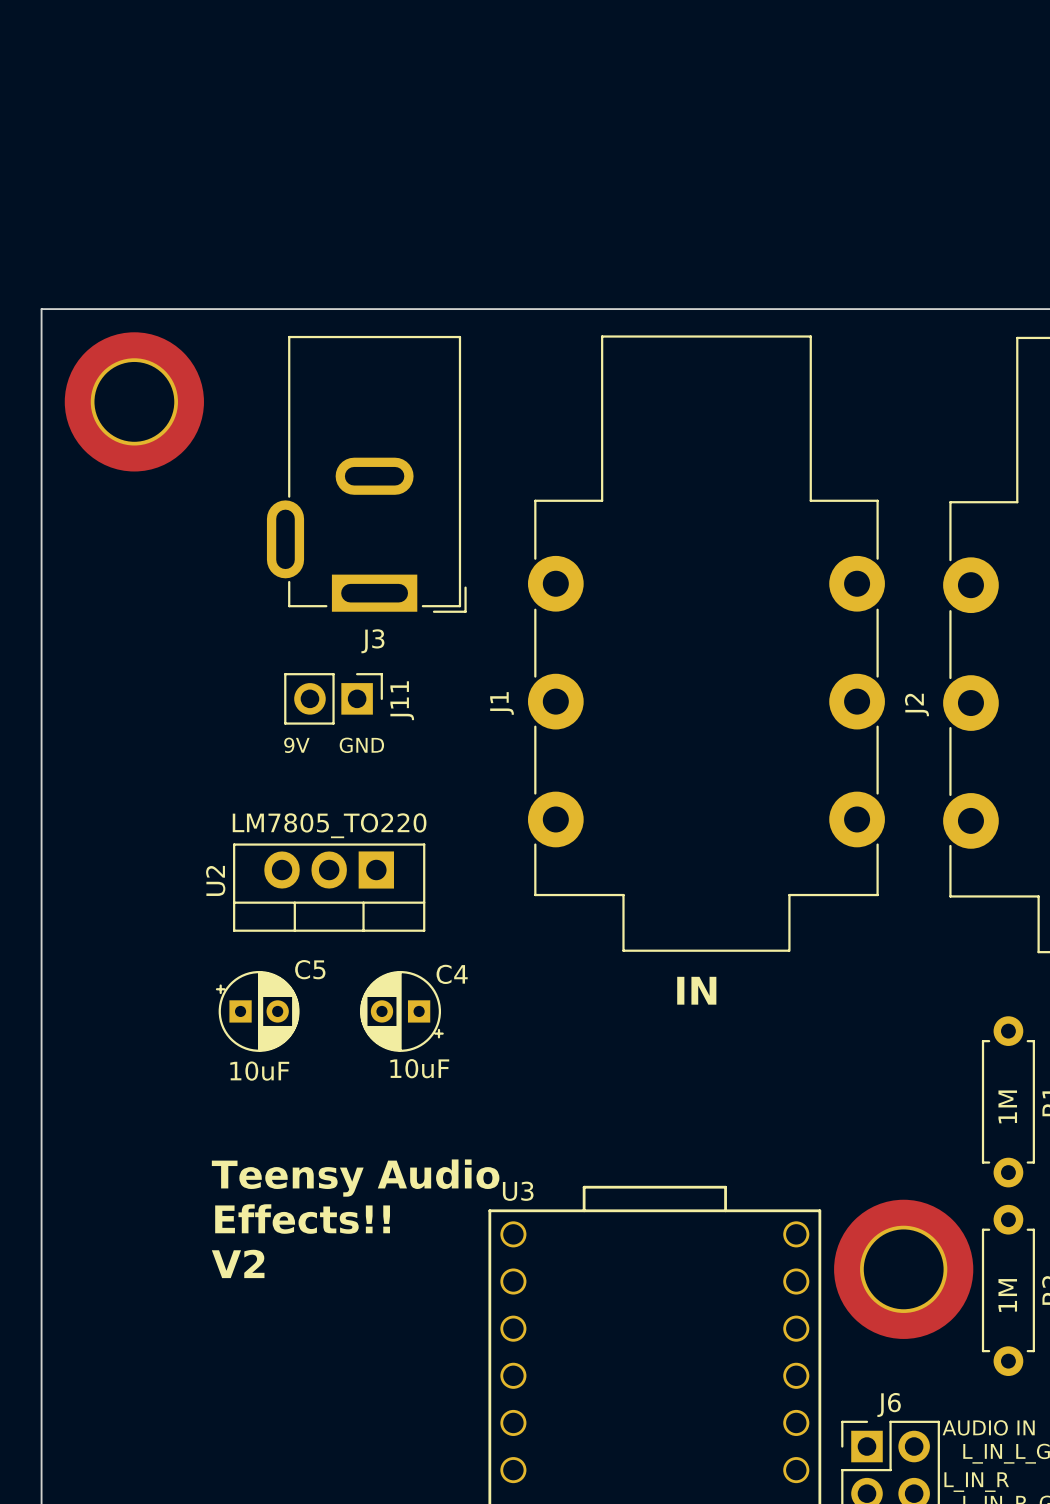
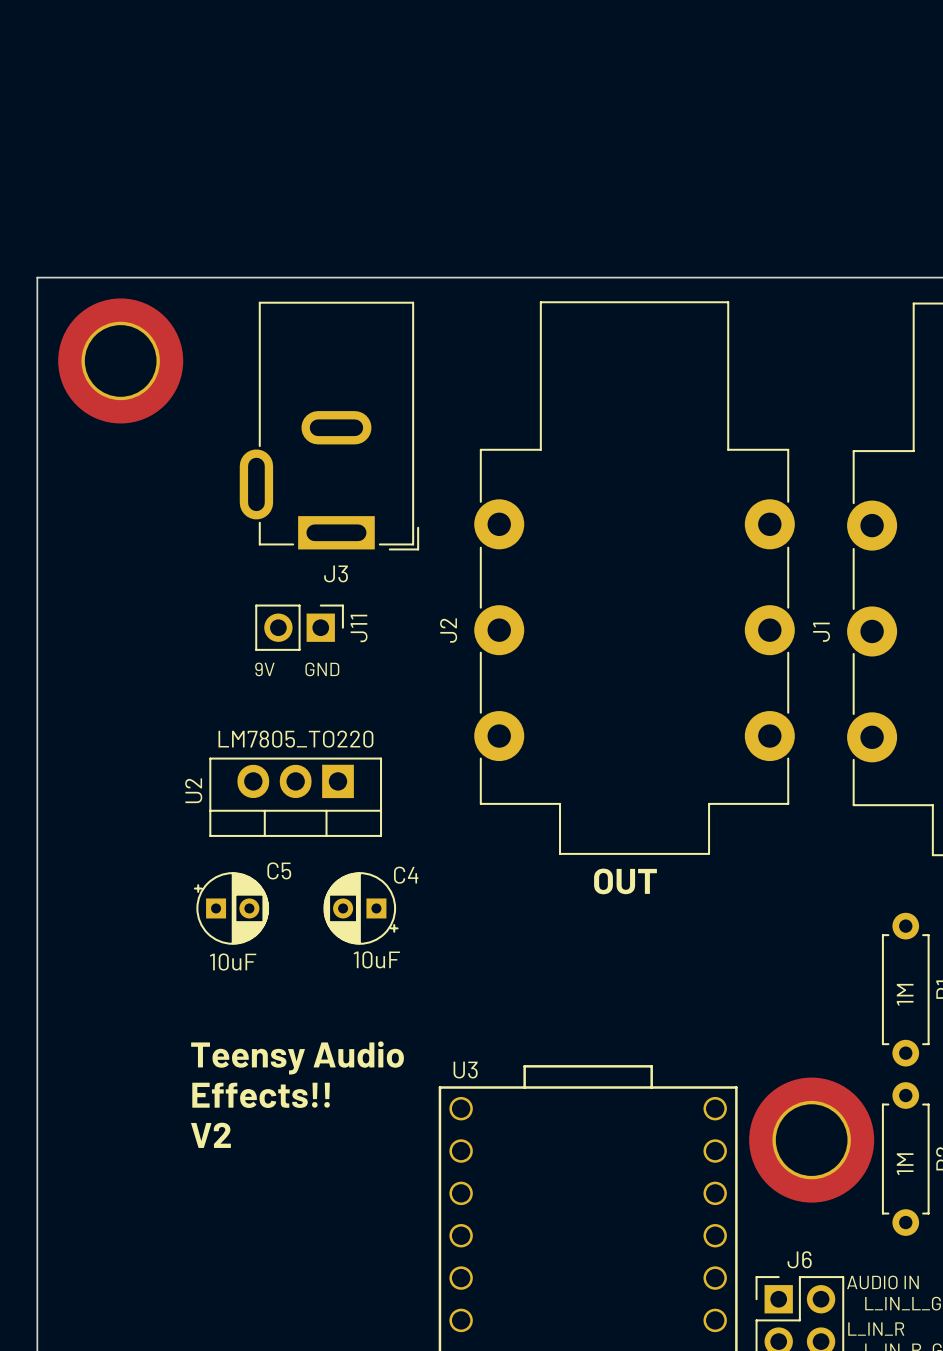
J1 name: J1 (502, 703) -> J2 (448, 630)
J2 name: J2 (916, 704) -> J1 (821, 632)
text: IN (696, 990) -> OUT (625, 881)

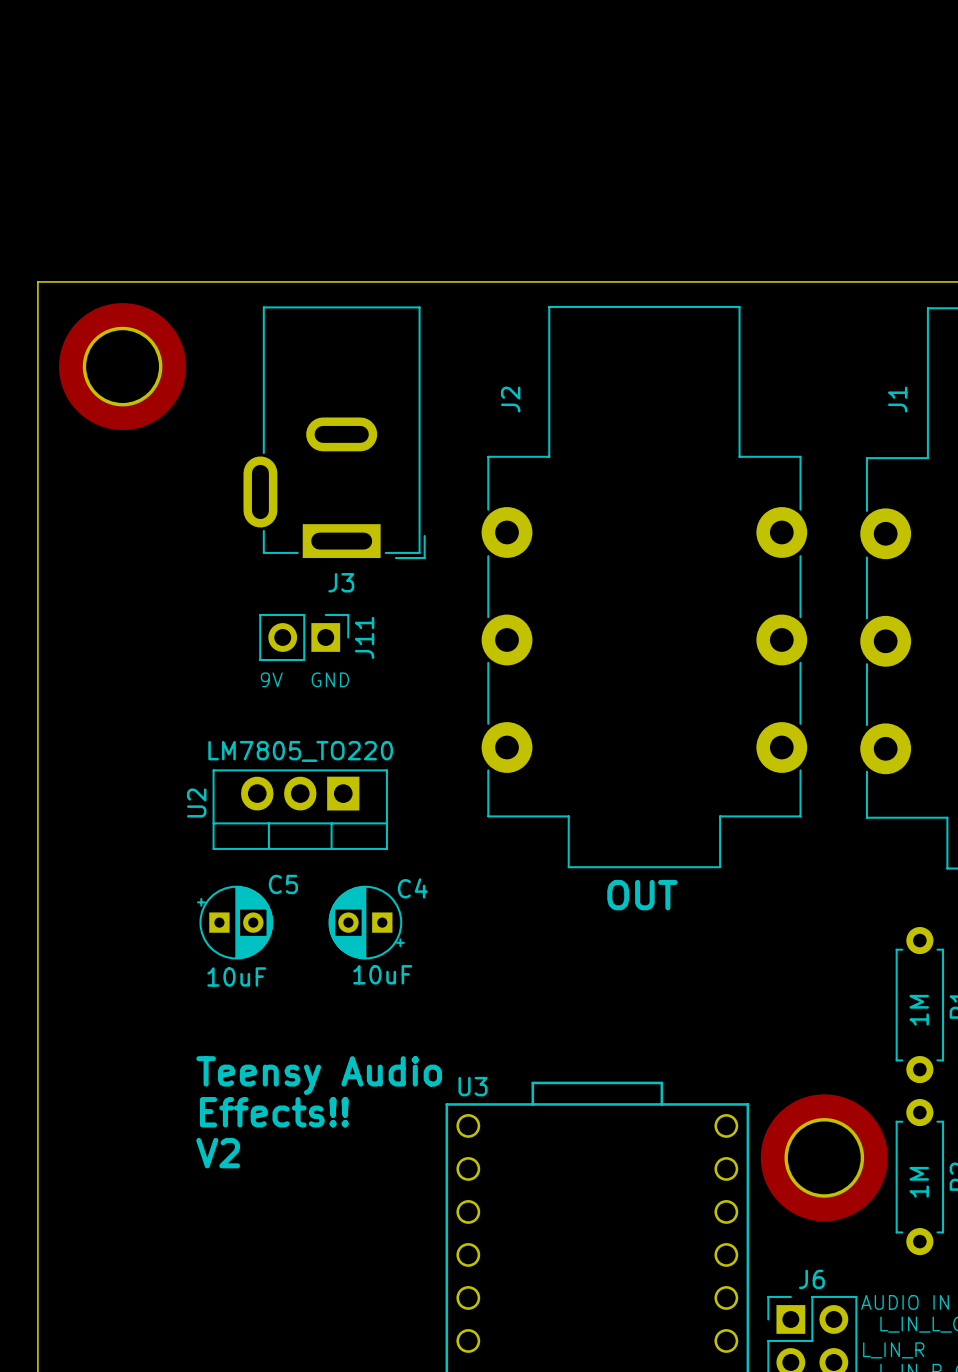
J2 name position: J2 (448, 630) -> J2 (510, 399)
J1 name position: J1 (821, 632) -> J1 (897, 399)

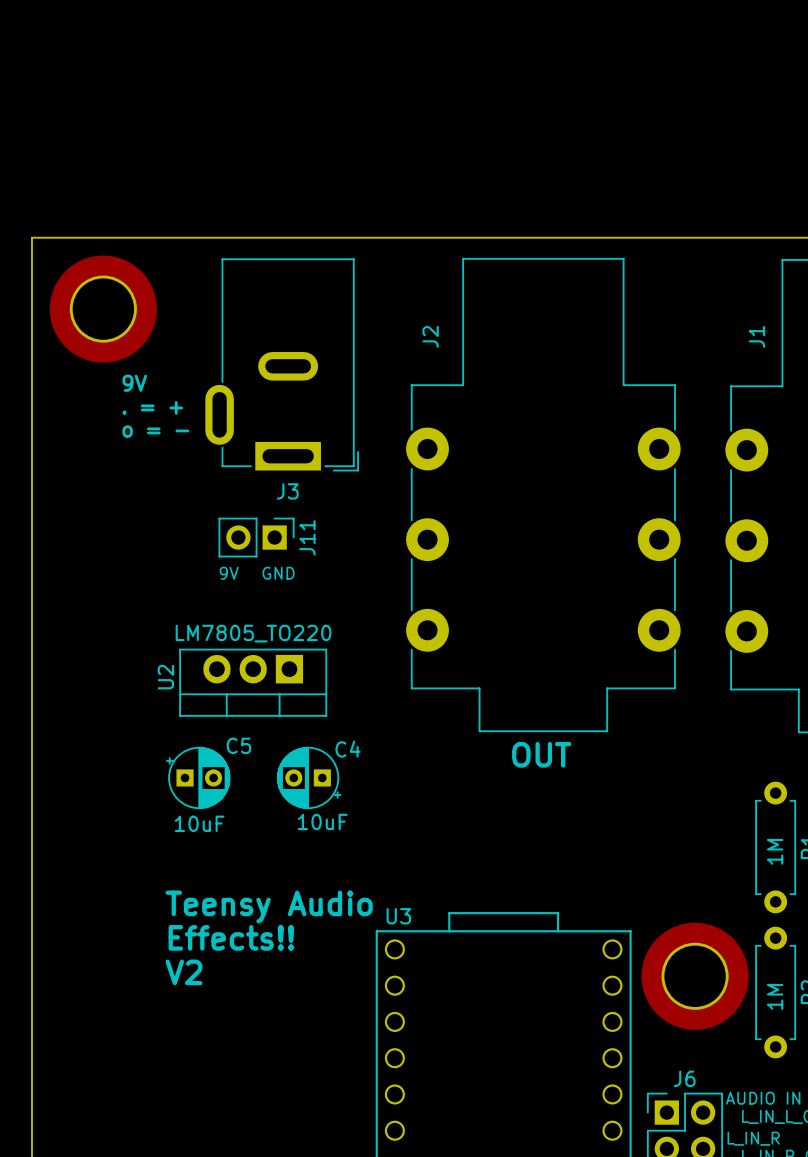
text: none -> 9V (134, 383)
text: none -> . = + (152, 407)
text: none -> o = - (155, 431)

